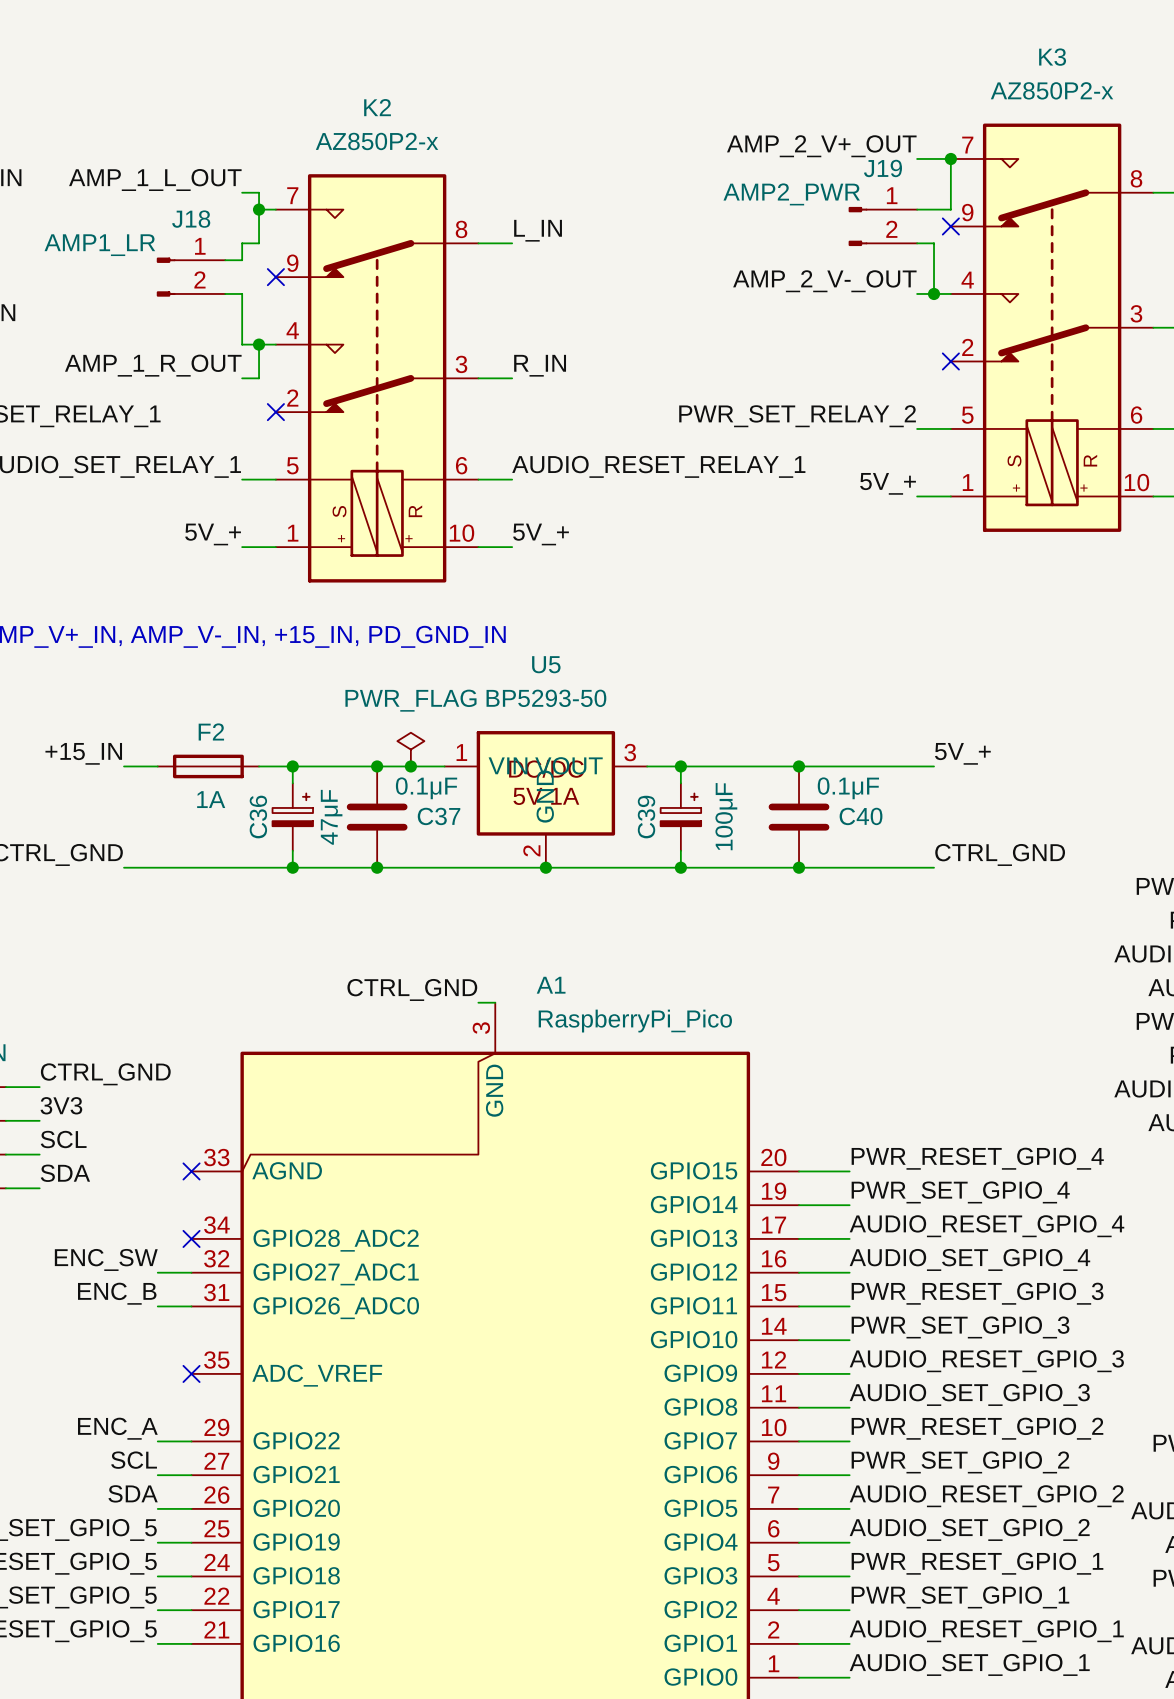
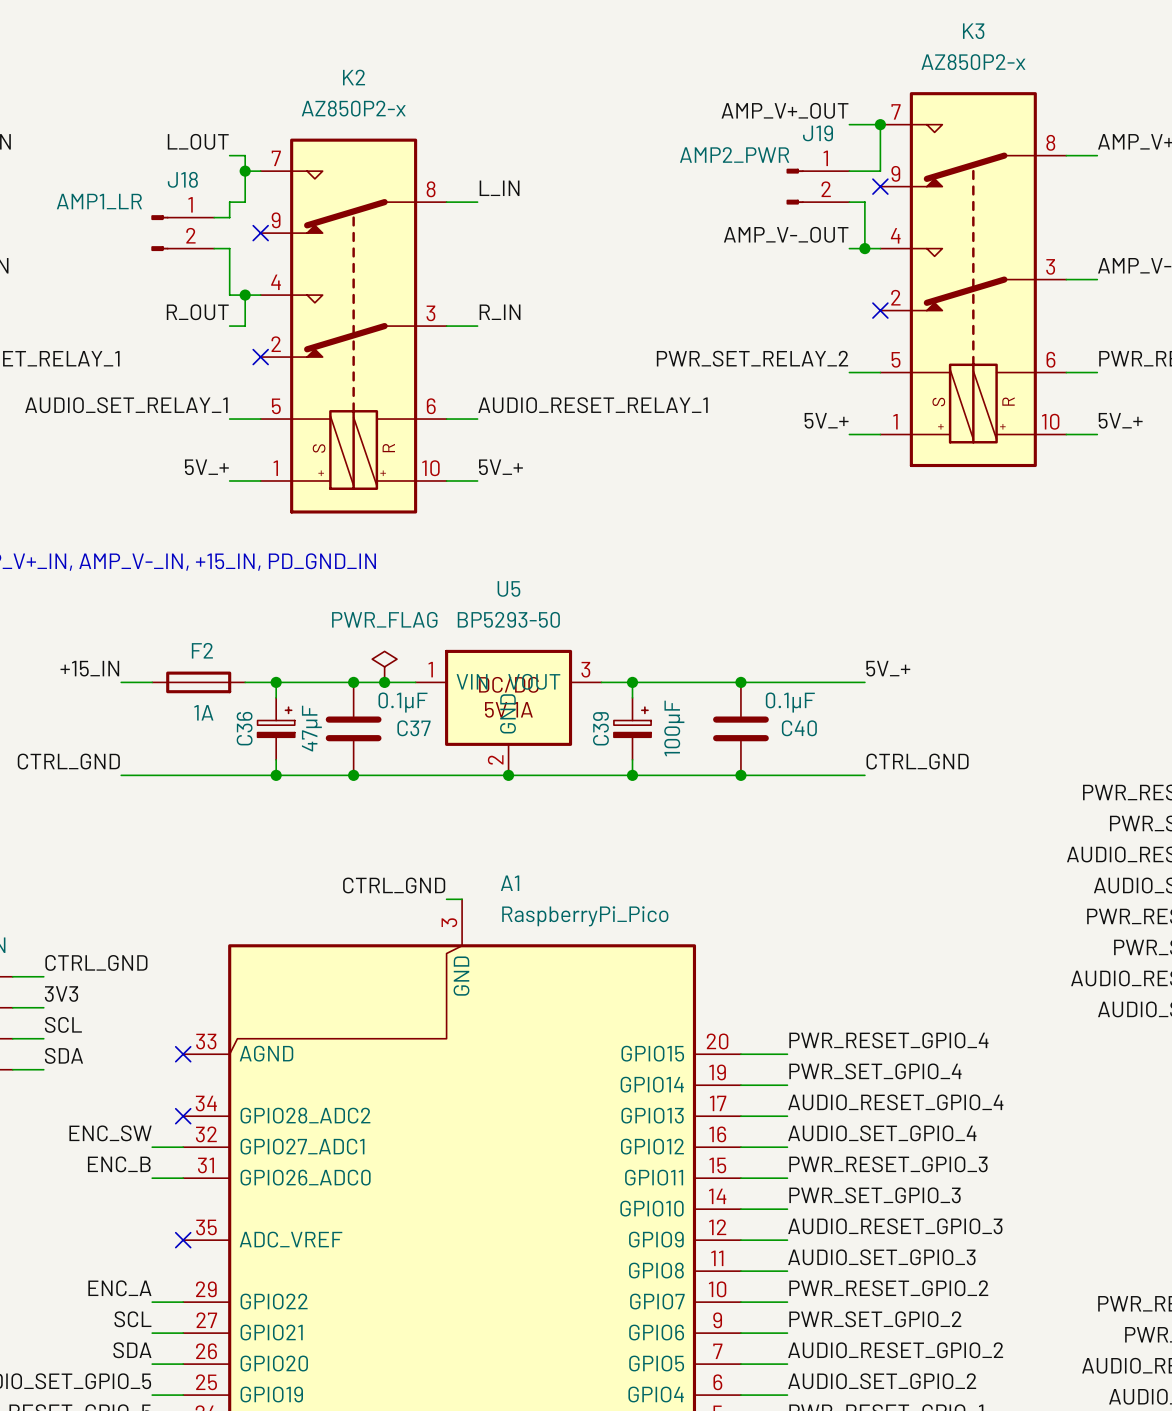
label: AMP_2_V+_OUT (821, 146) -> AMP_V+_OUT (784, 110)
label: AMP_1_L_OUT (155, 179) -> L_OUT (198, 141)
label: AMP_2_V-_OUT (824, 281) -> AMP_V-_OUT (786, 234)
label: AMP_1_R_OUT (153, 365) -> R_OUT (197, 312)

